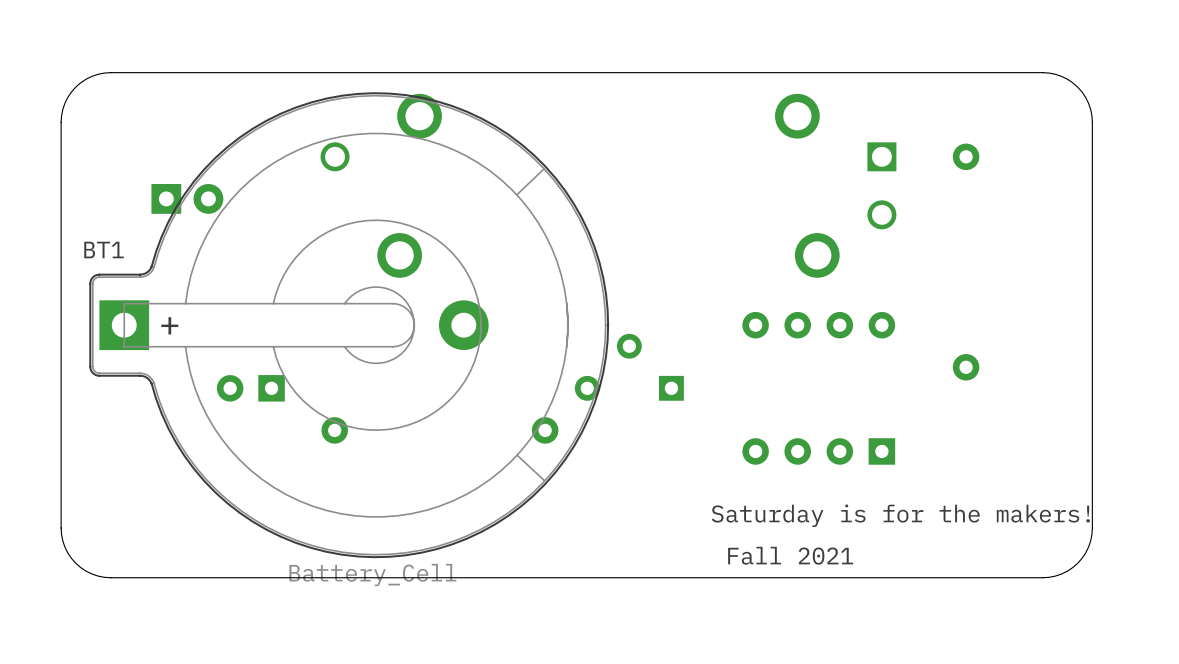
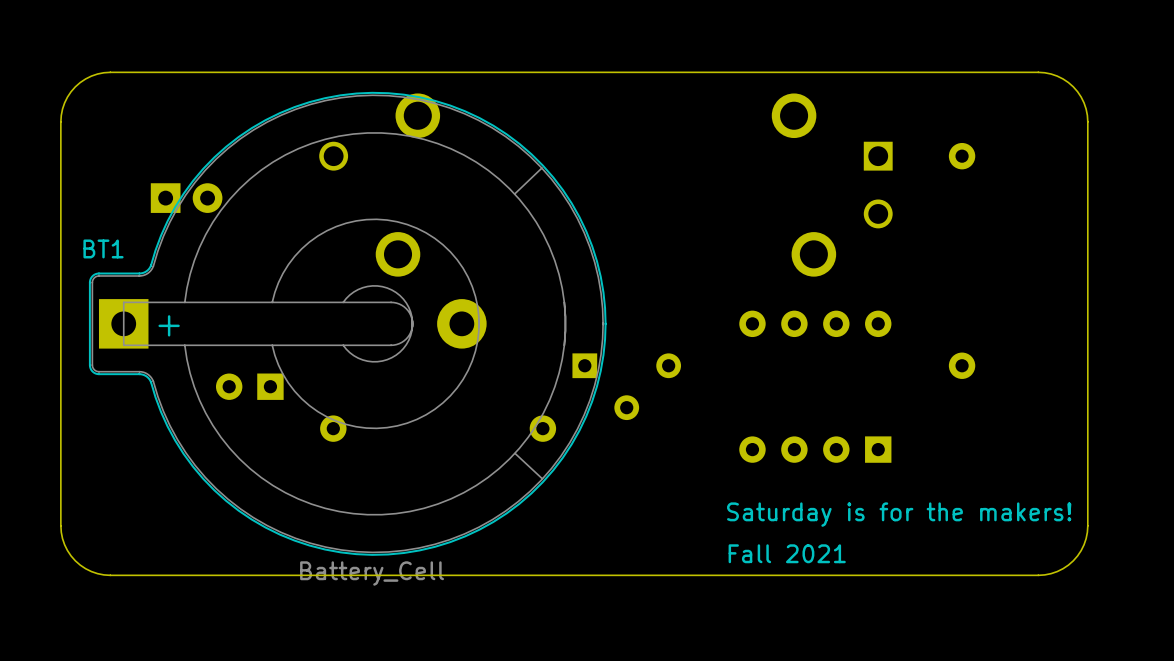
part rotation: 0° (629, 367) -> 180° (626, 386)

